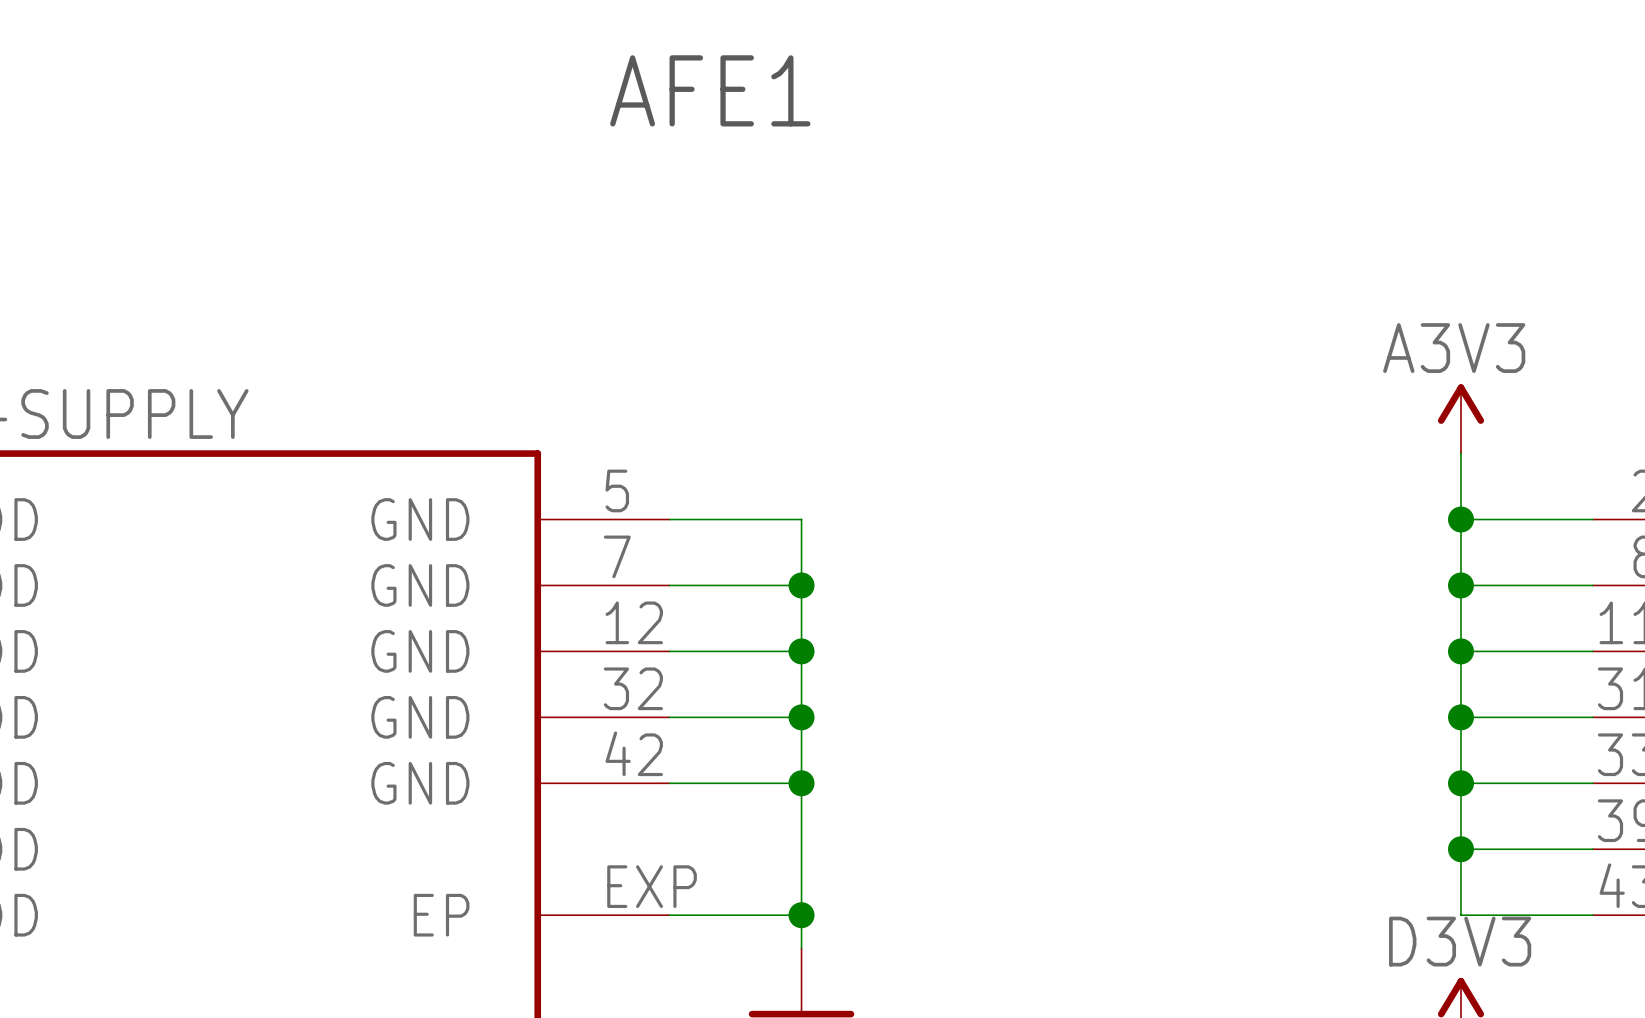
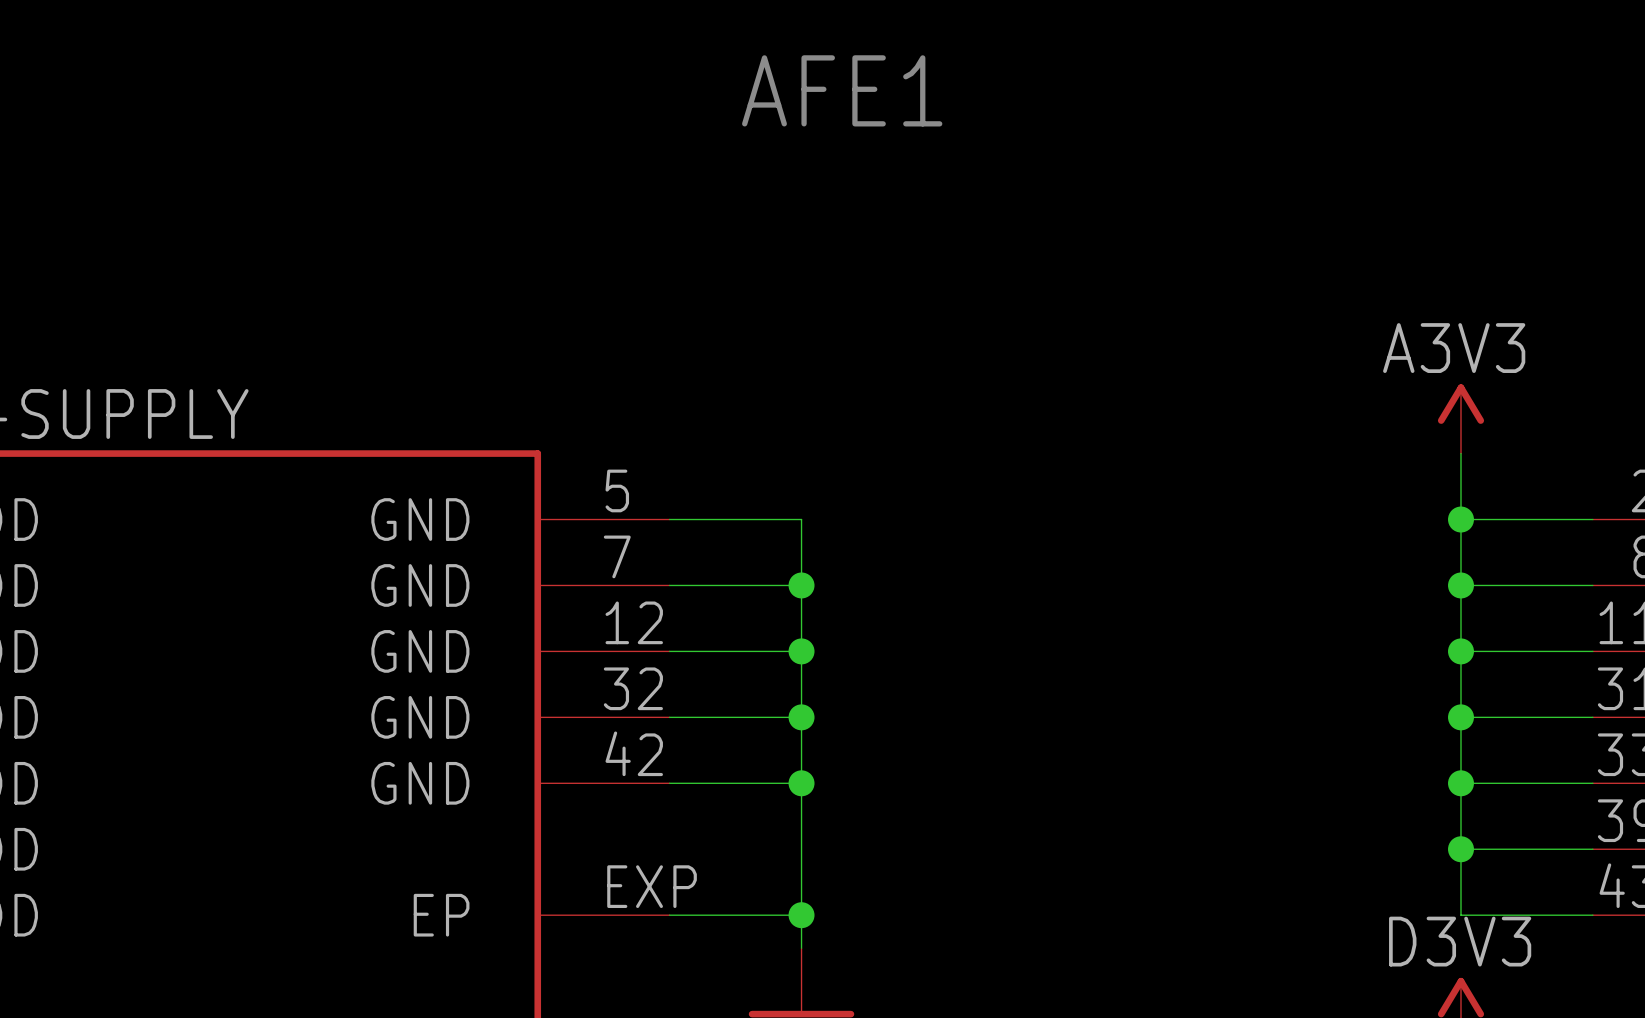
text position: AFE1 (710, 90) -> AFE1 (842, 90)

